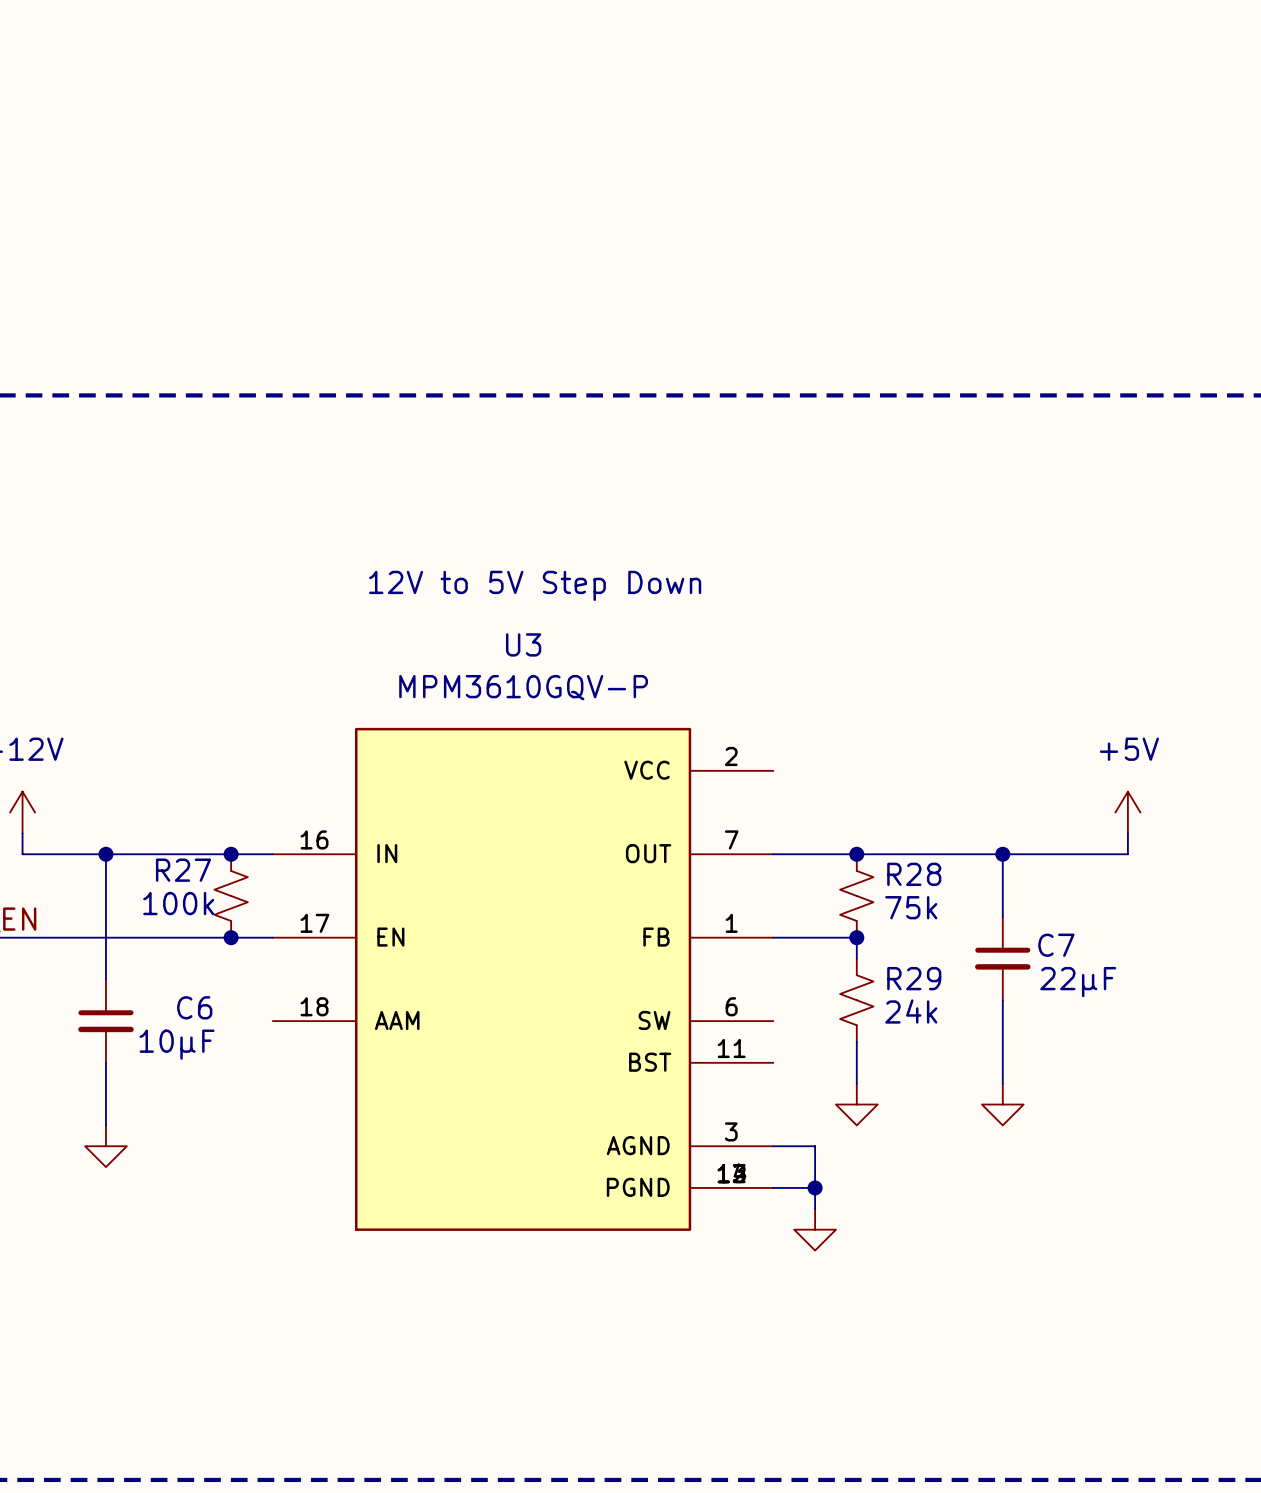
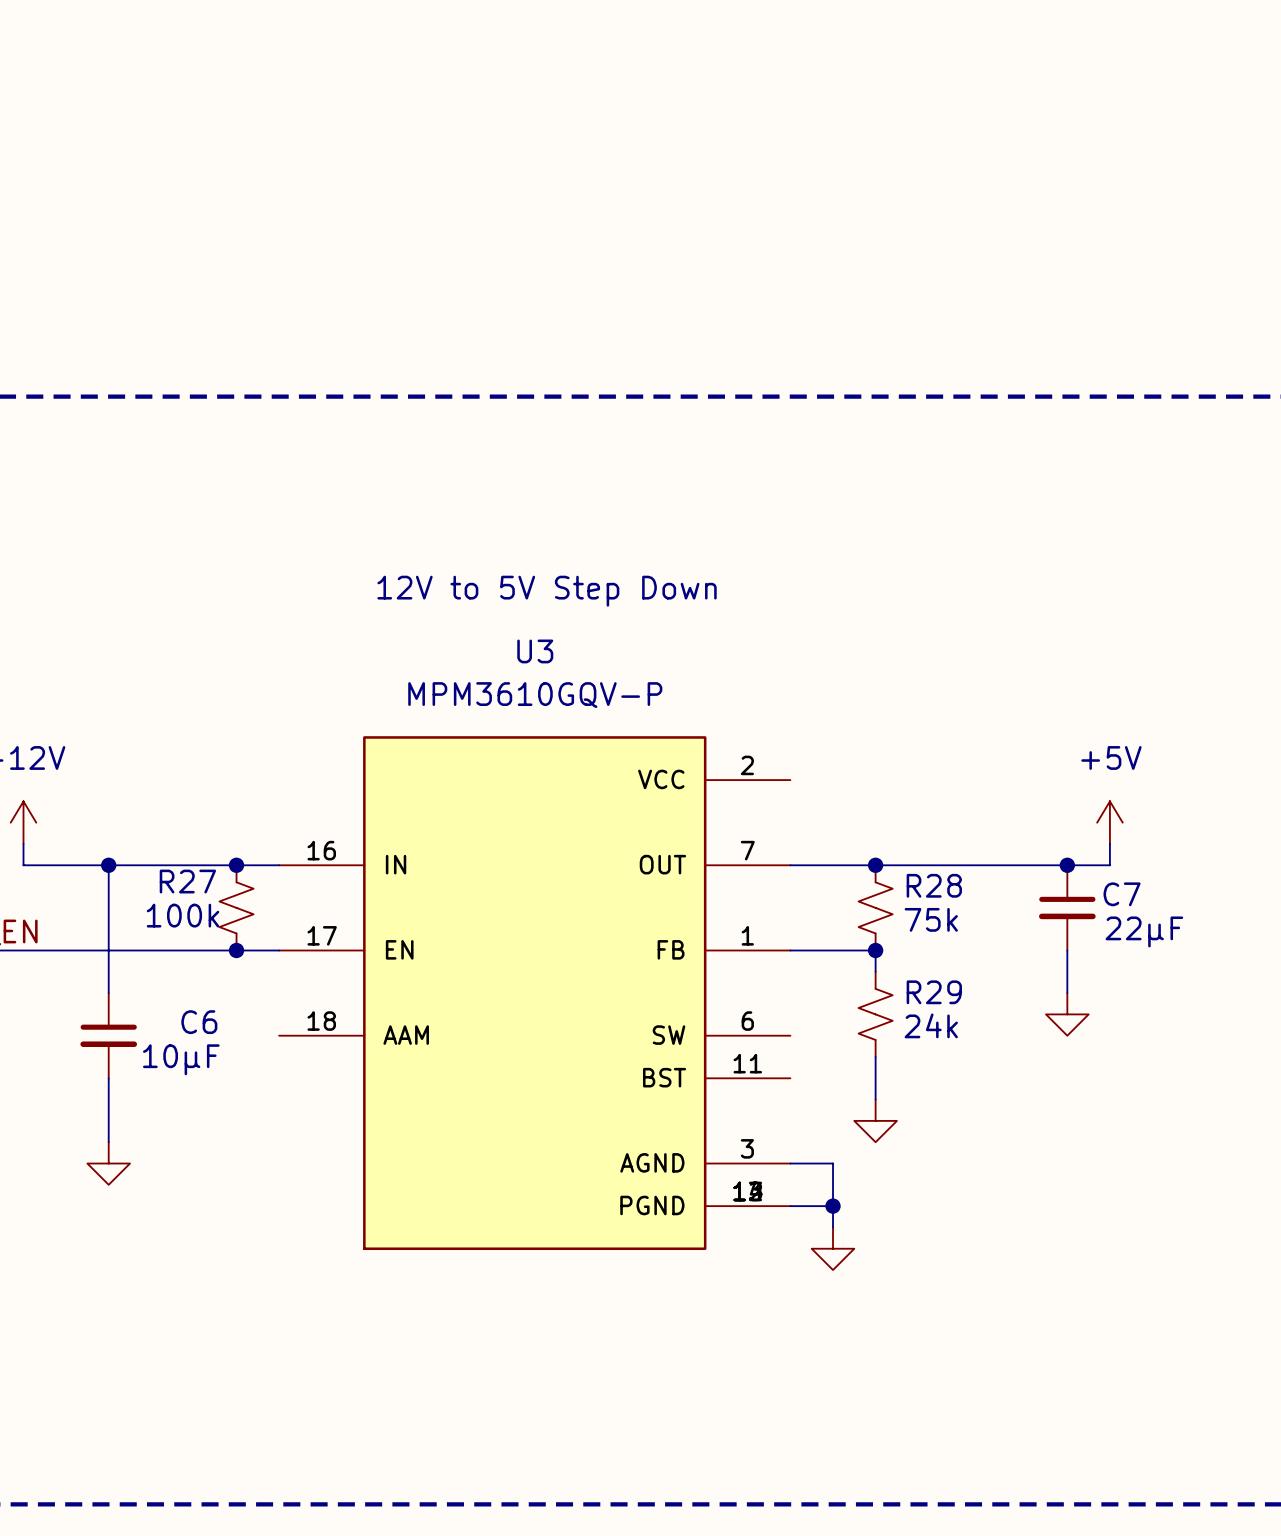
power symbol position: +5V (1127, 812) -> +5V (1109, 822)
wire: (1127, 833) (1127, 854) (1086, 854) -> (1109, 843) (1109, 865)
wire: (1002, 854) (1002, 916) -> none
junction position: (1002, 854) -> (1067, 865)
wire: none -> (1067, 950) (1067, 993)
C7 position: (1002, 958) -> (1067, 907)
wire: (1002, 1000) (1002, 1083) -> none
power symbol position: (1002, 1104) -> (1067, 1014)

